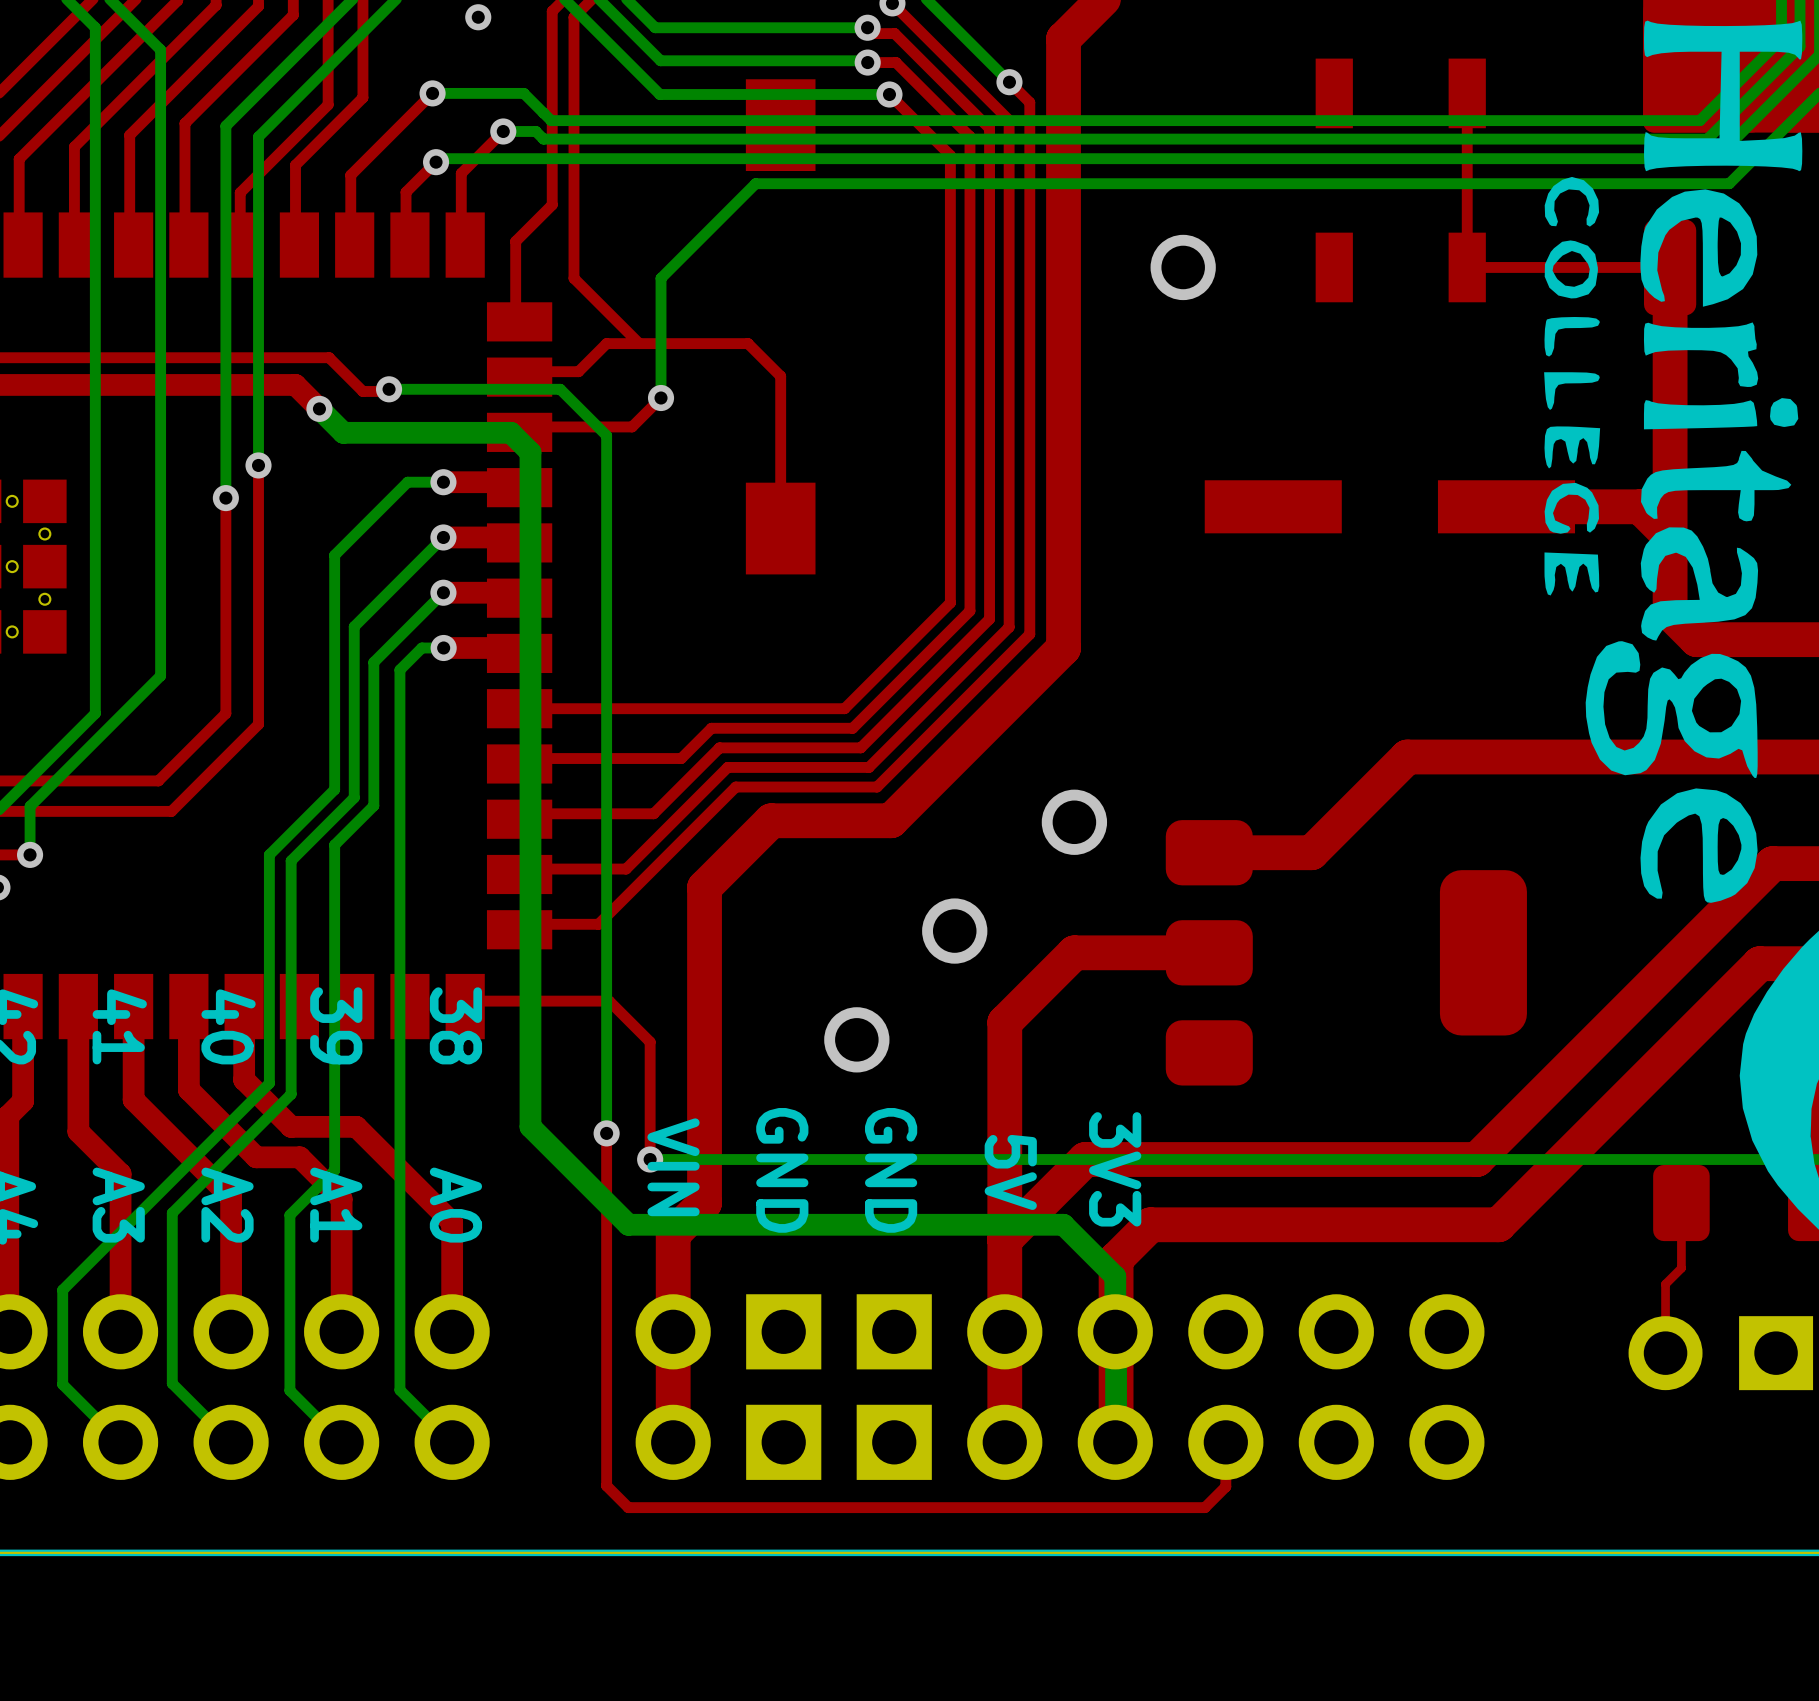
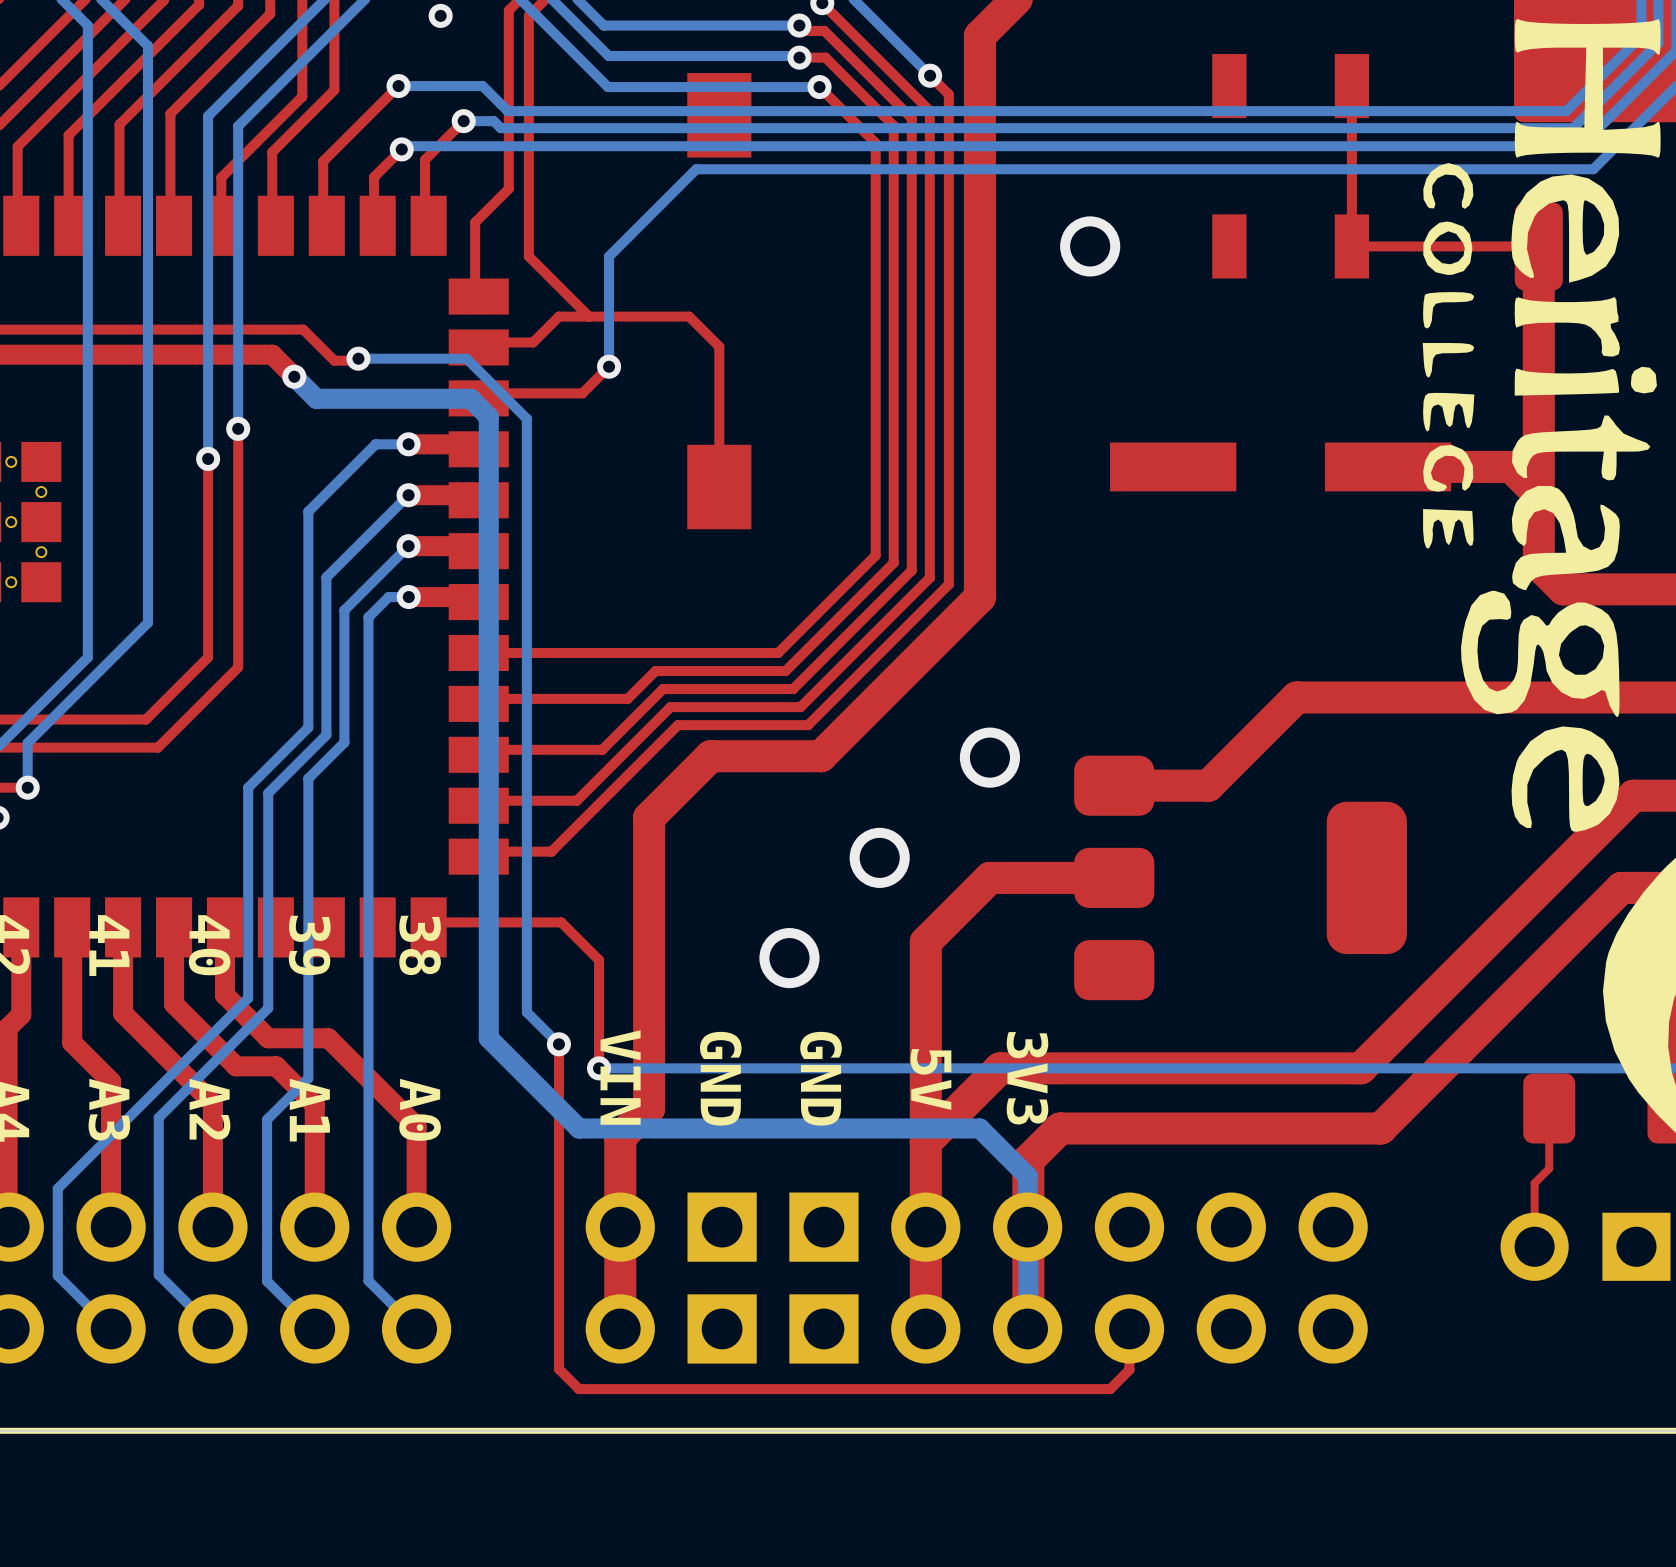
bottom track: (506, 389) (560, 389) (606, 435) (606, 1133) -> (466, 358) (526, 418) (526, 1012) (558, 1044)

